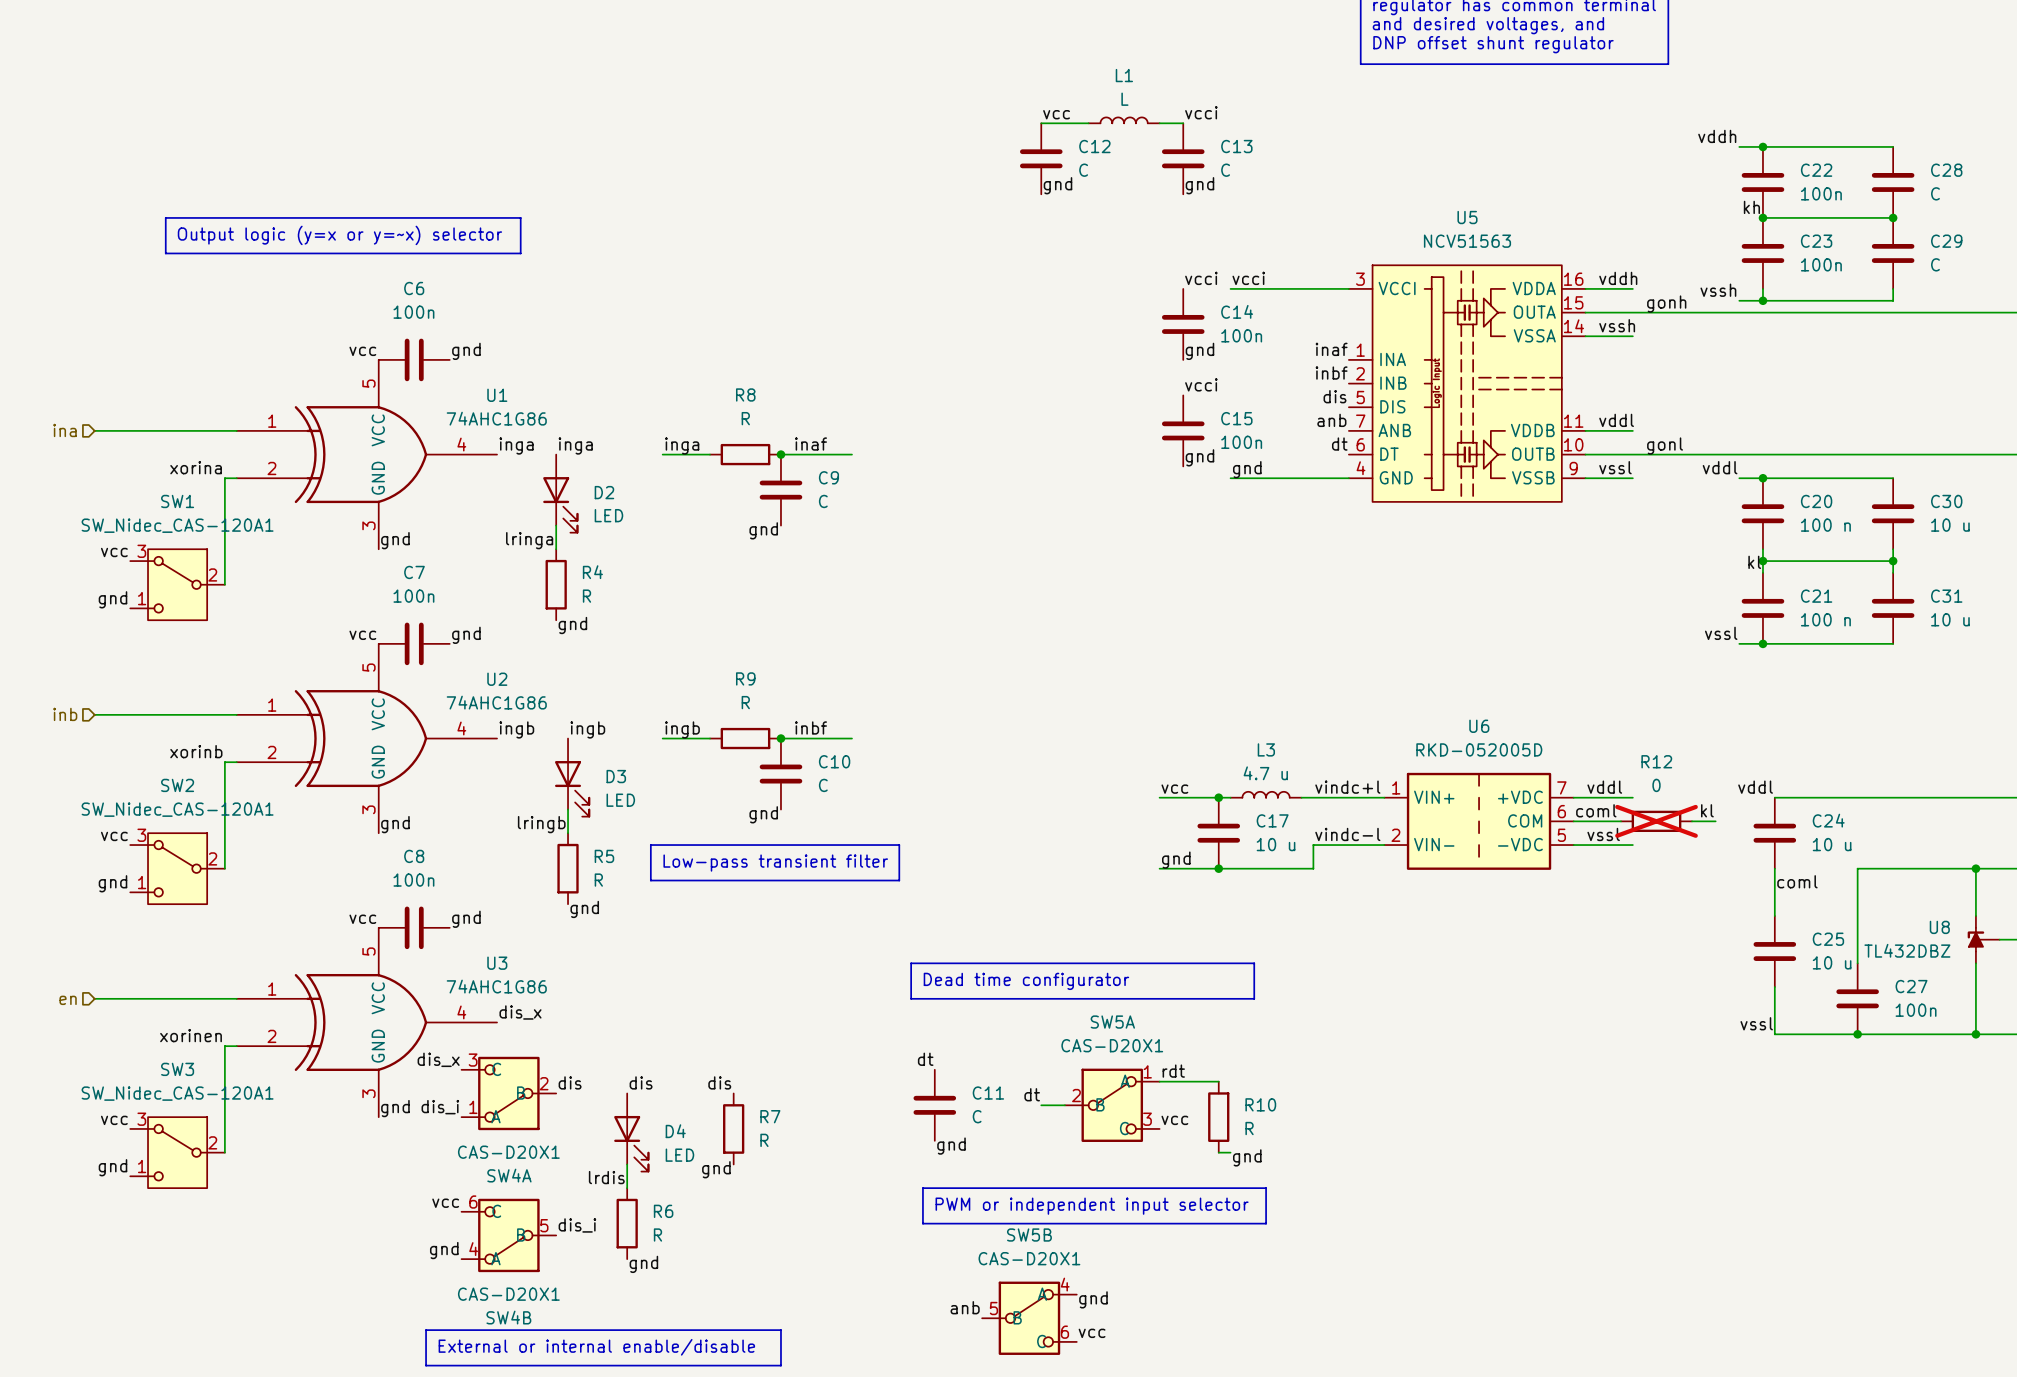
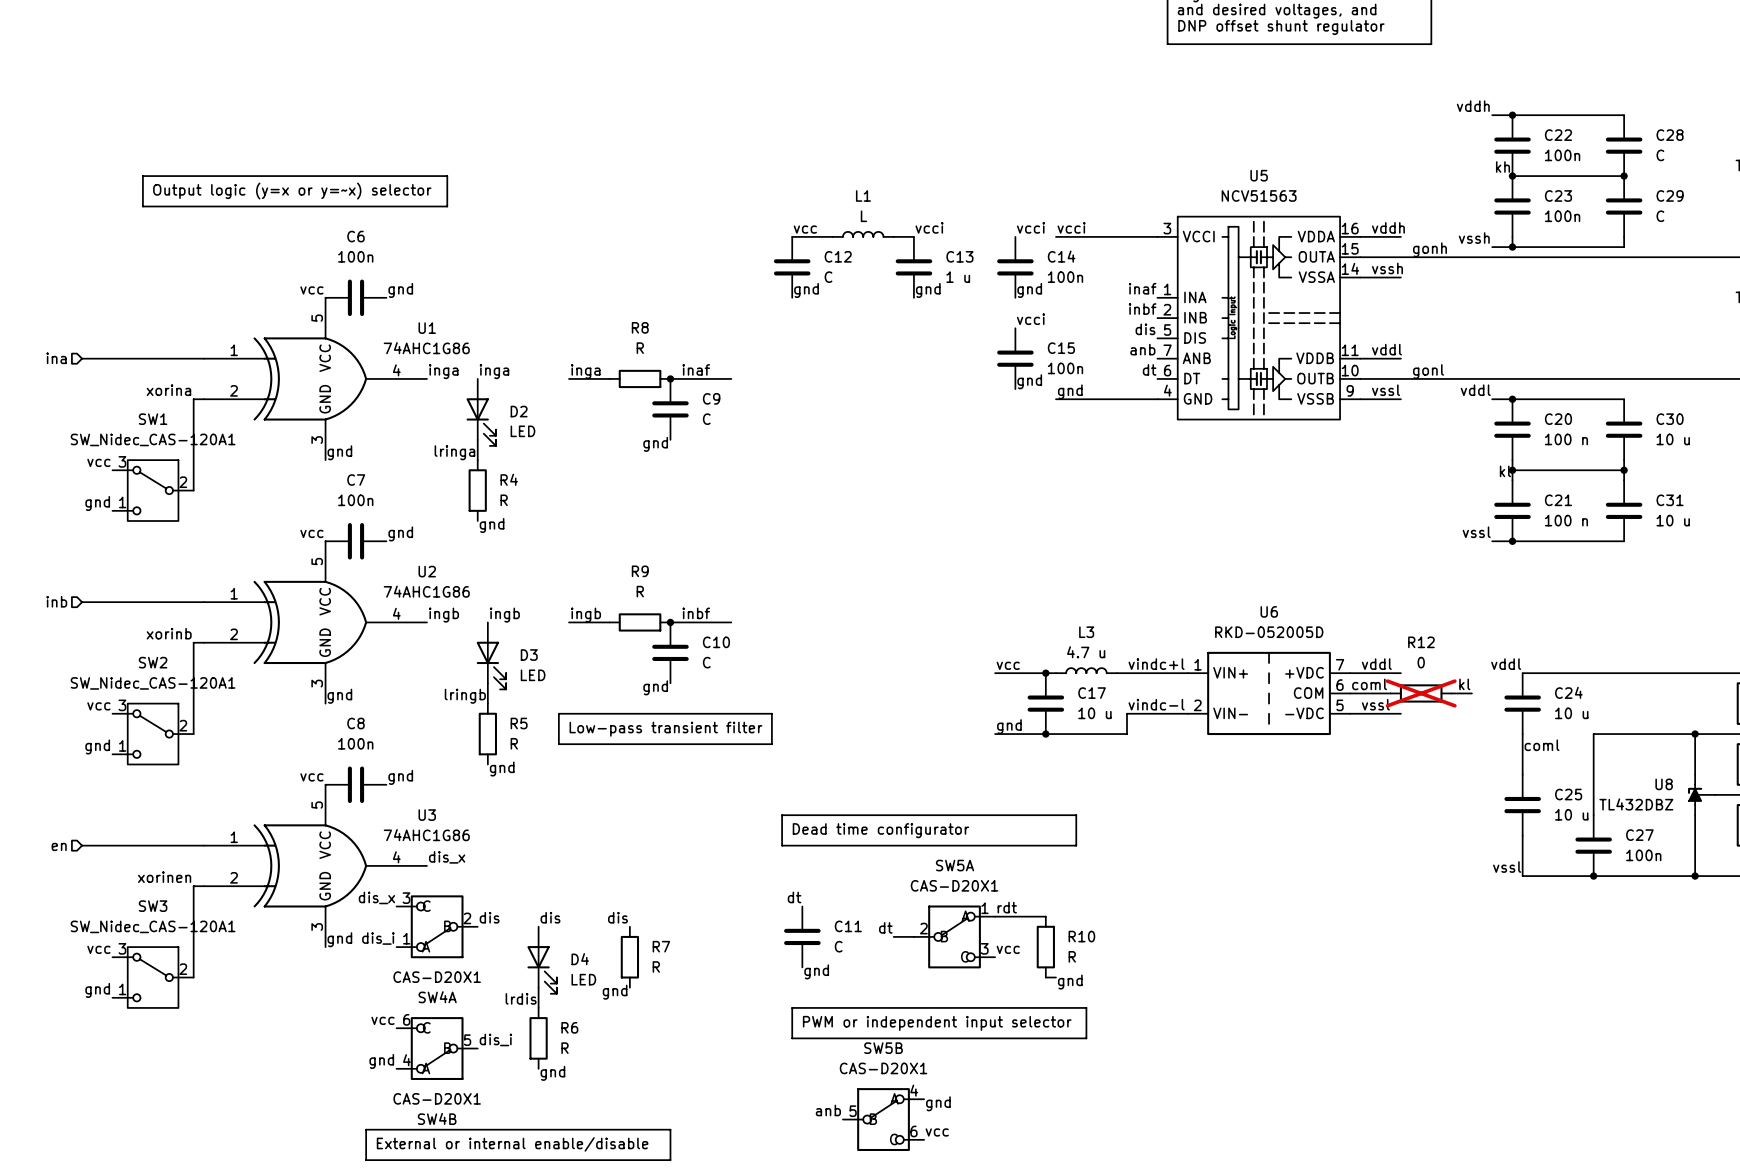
label position: vcci (1201, 112) -> vcci (929, 227)
label position: vcc (1056, 114) -> vcc (805, 229)
L1 position: (1124, 120) -> (863, 234)
wire: (1041, 123) (1088, 123) -> (792, 236) (832, 236)
wire: (1159, 123) (1183, 123) -> (893, 236) (913, 236)
C12 position: (1041, 158) -> (792, 267)
C13 position: (1183, 158) -> (913, 267)
C13 value: C (1225, 170) -> 1 u (958, 277)
label: gnd (1057, 185) -> none
label: gnd (1199, 185) -> none
label: none -> gnd (806, 290)
label: none -> gnd (928, 290)

